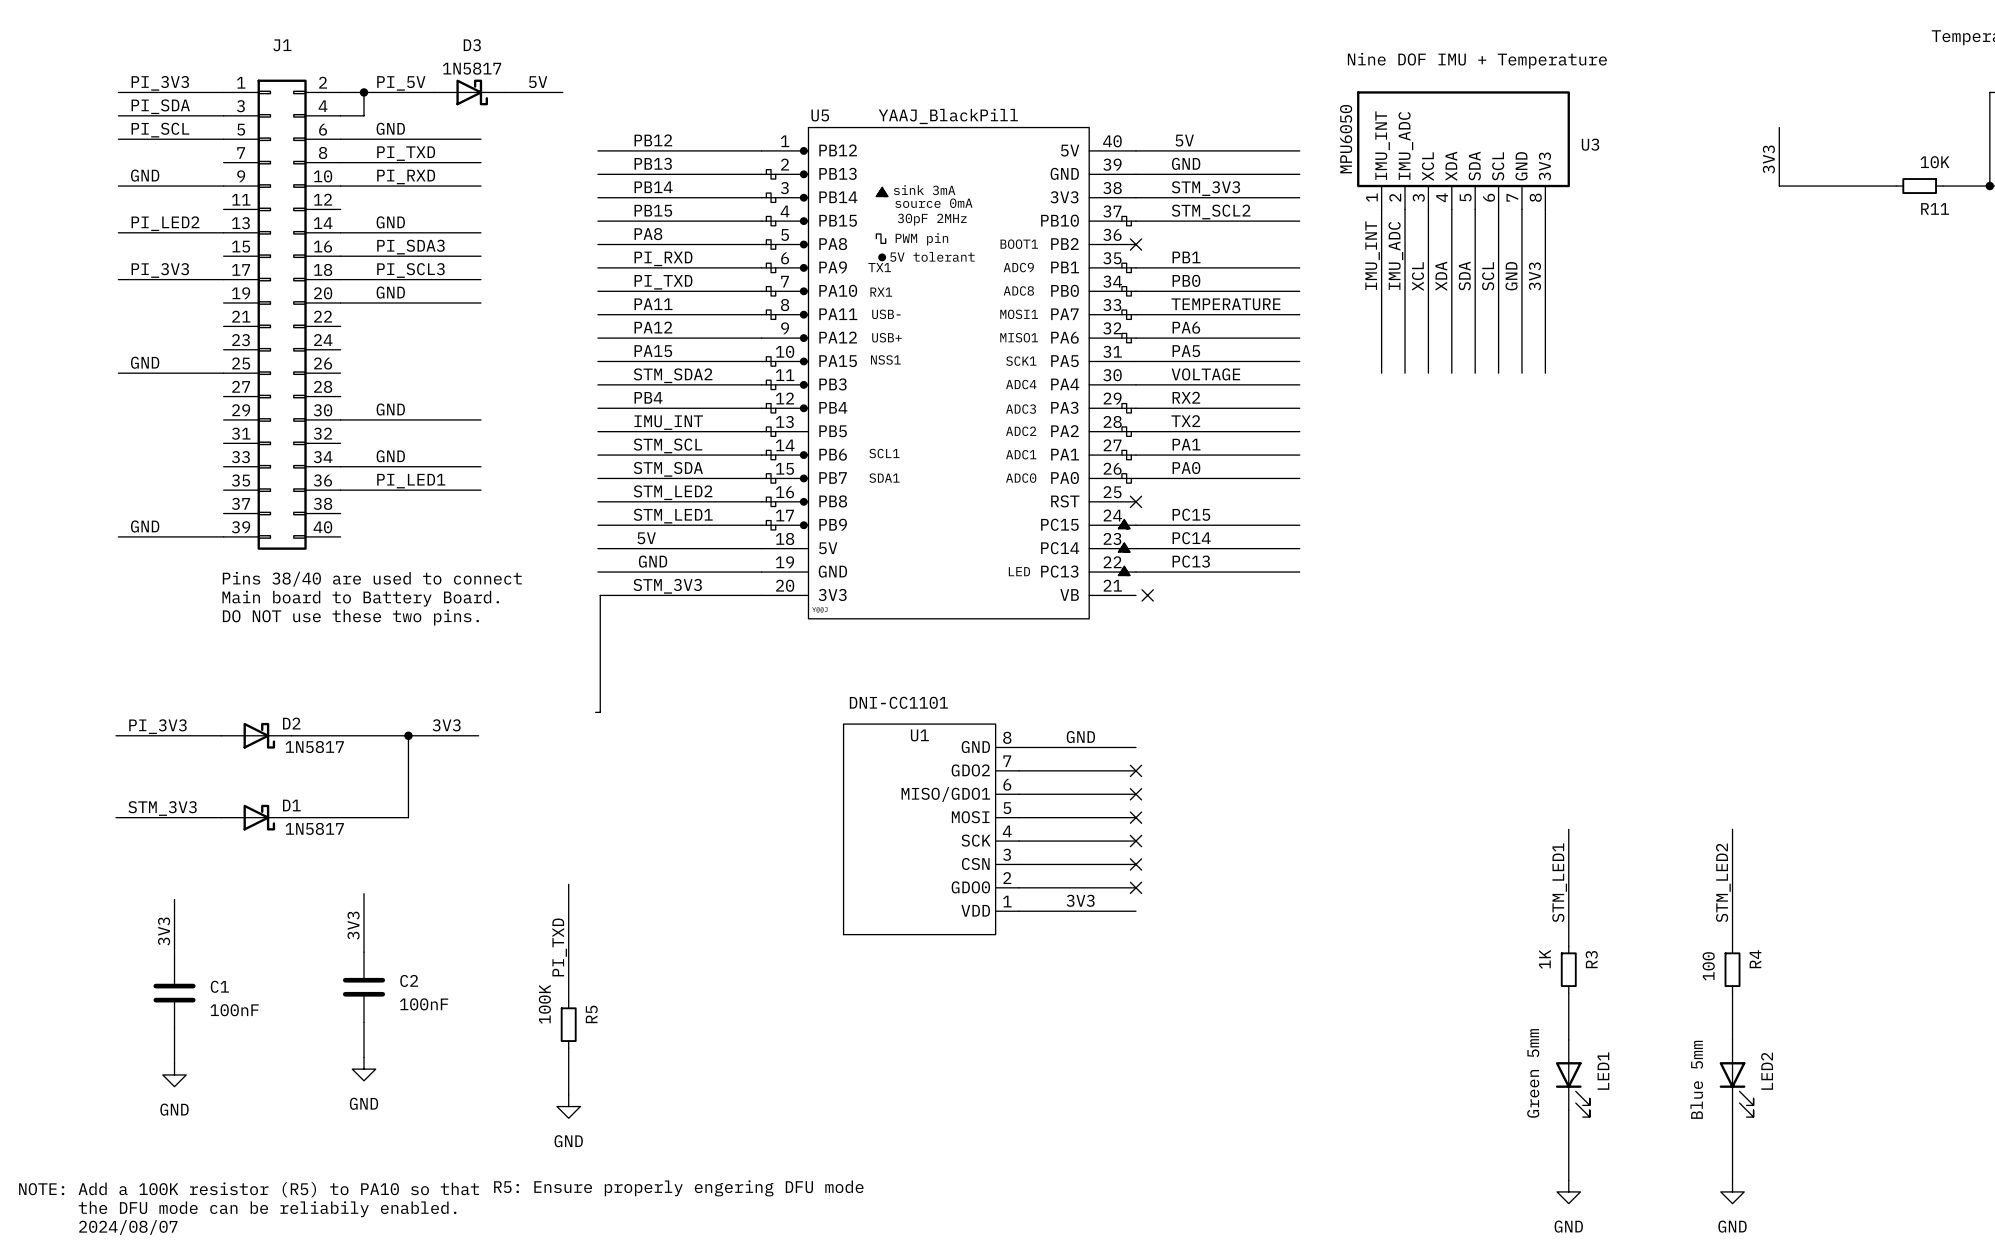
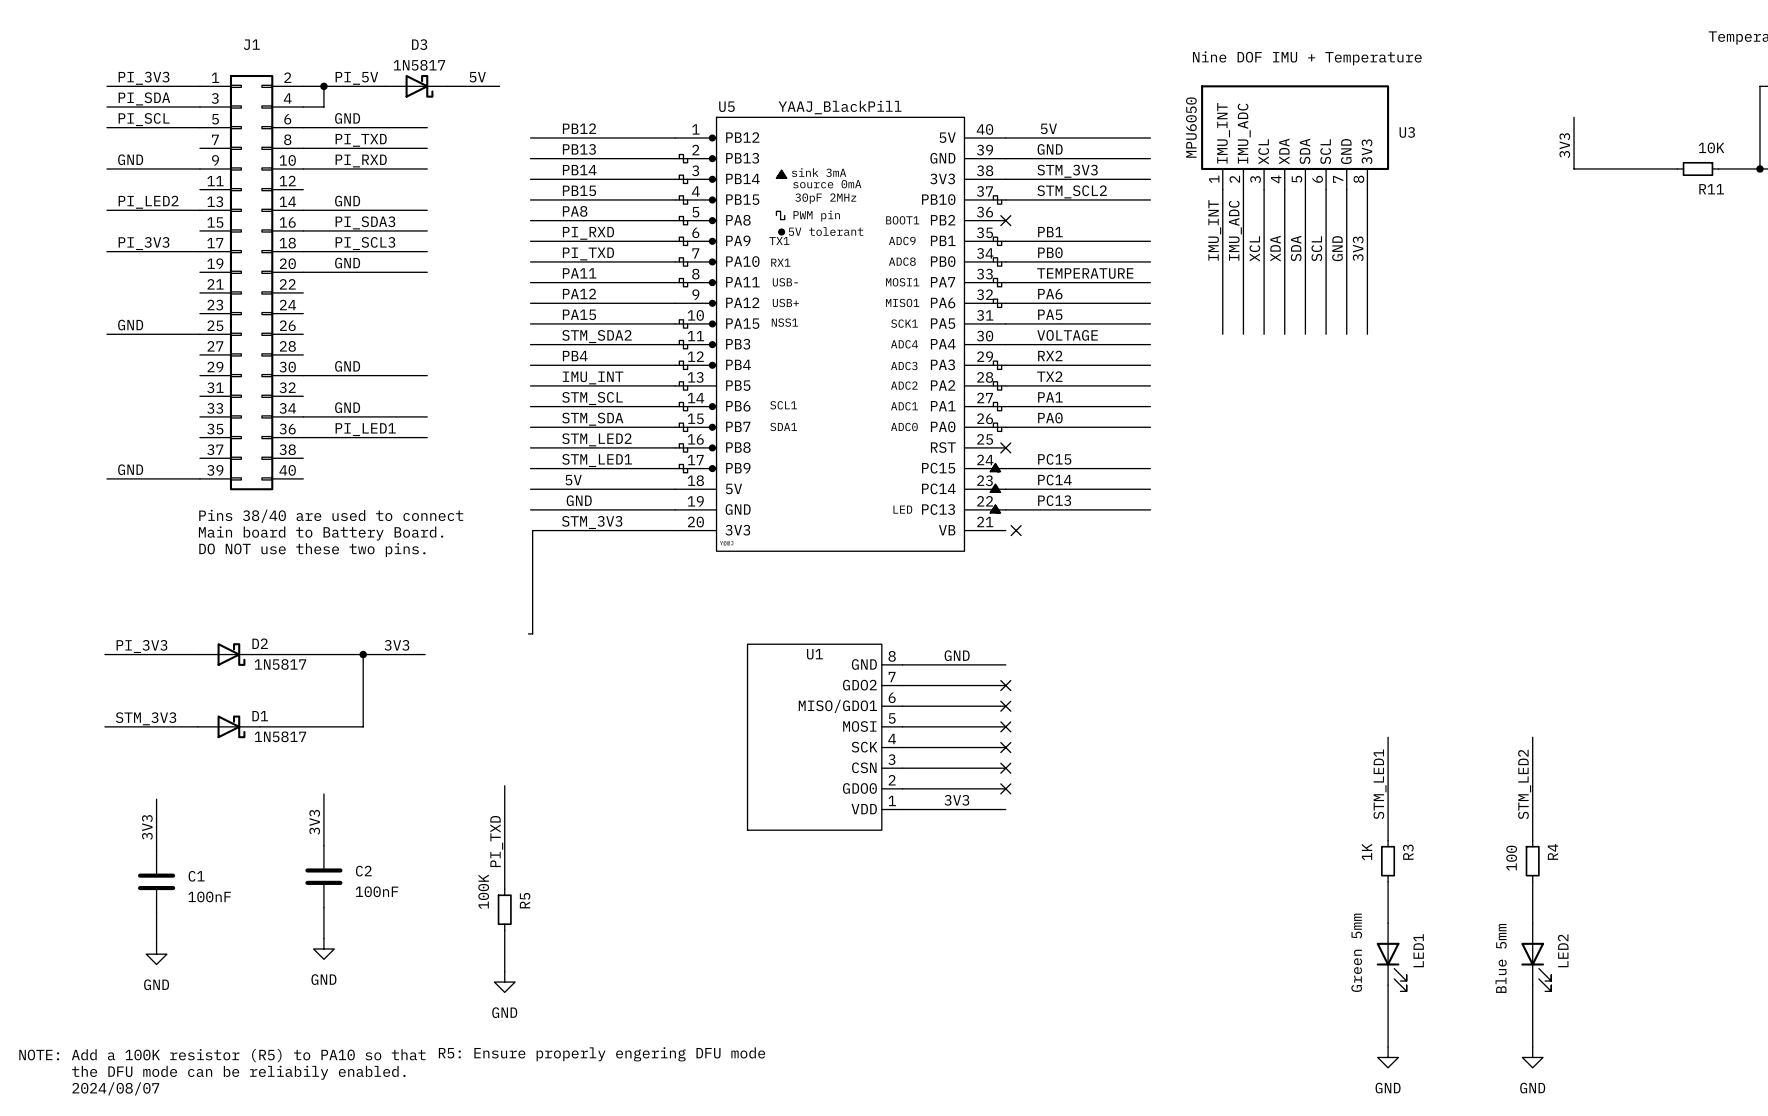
text: DNI-CC1101 (898, 702) -> none

